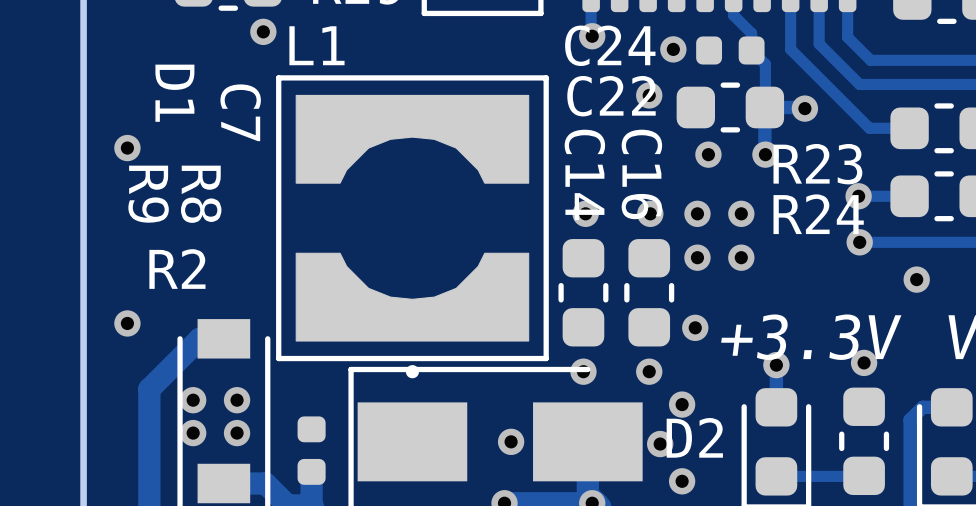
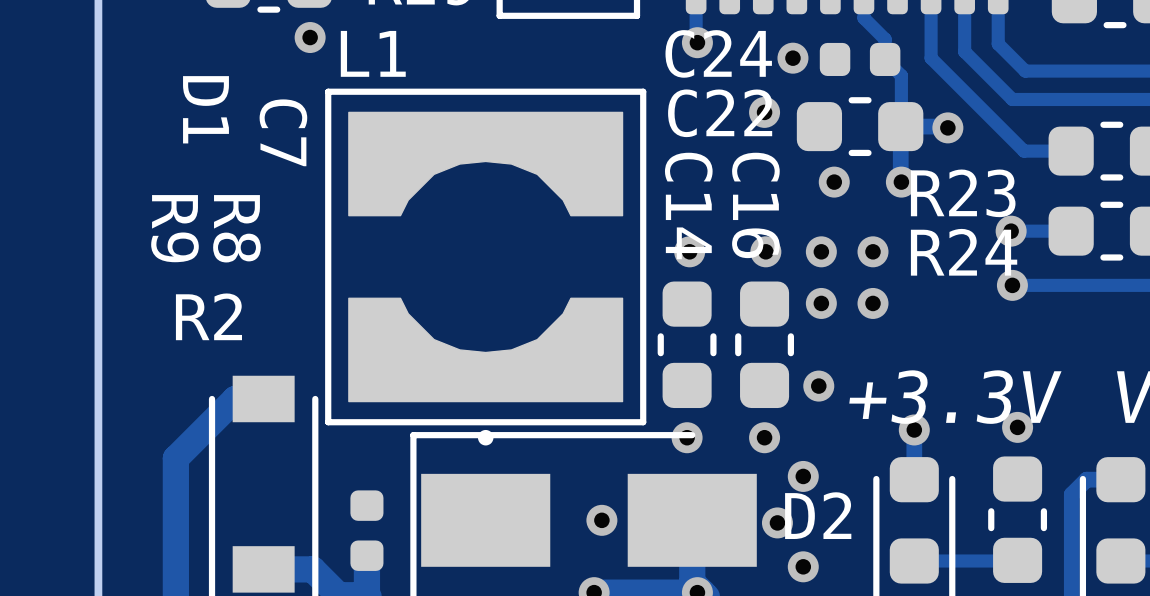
via: (127, 148) -> none
via: (916, 279) -> none
via: (127, 323) -> none
via: (193, 400) -> none
via: (237, 400) -> none
via: (193, 433) -> none
via: (237, 433) -> none

